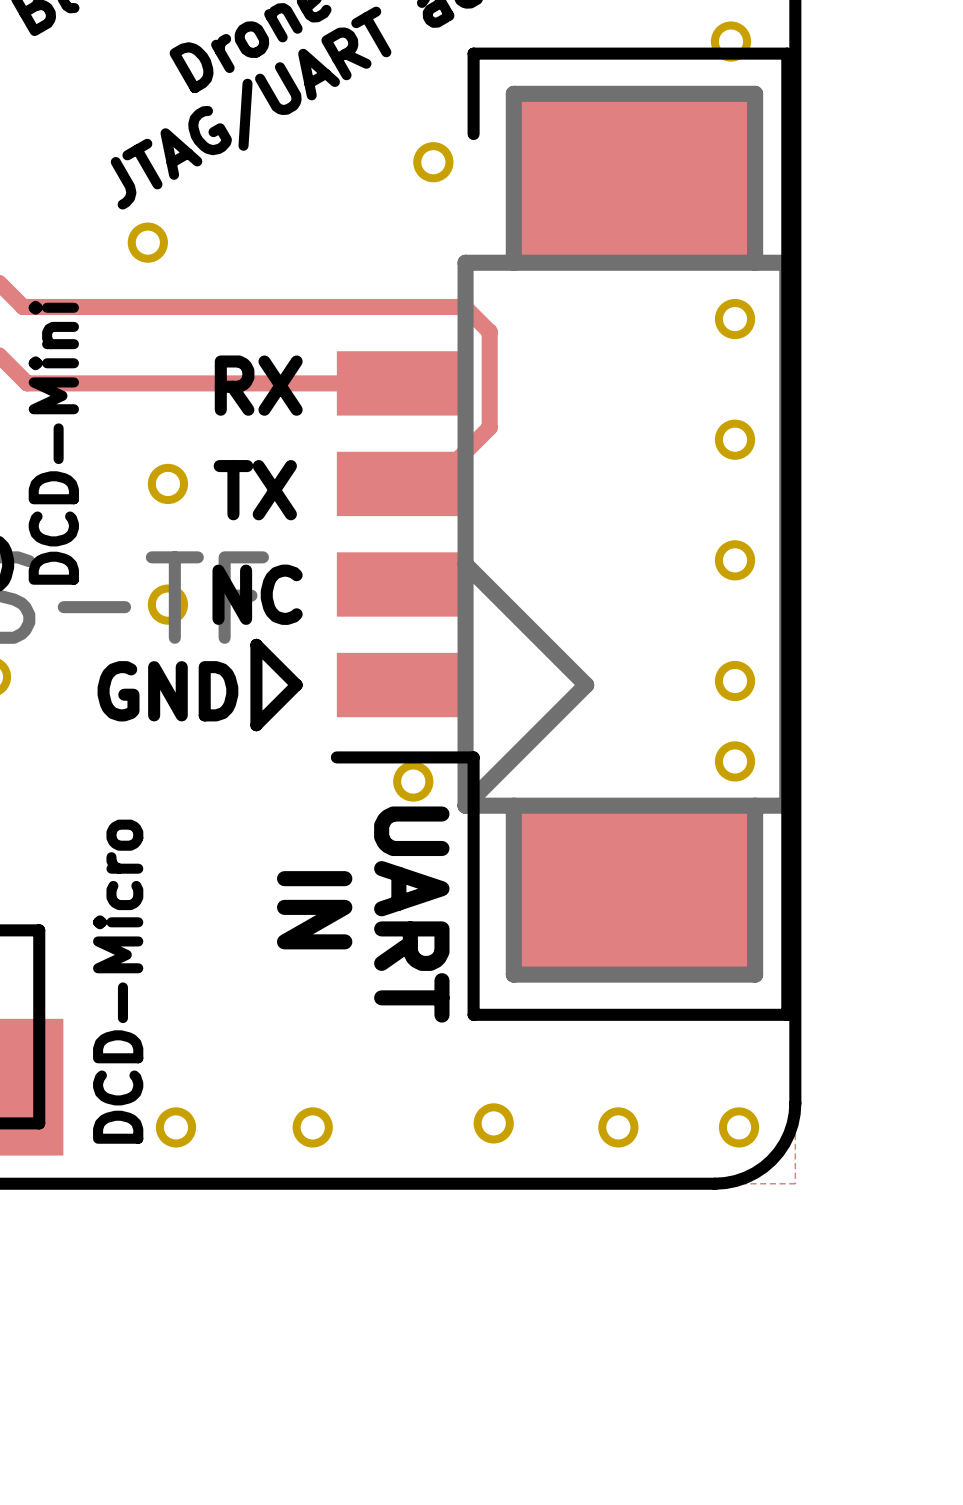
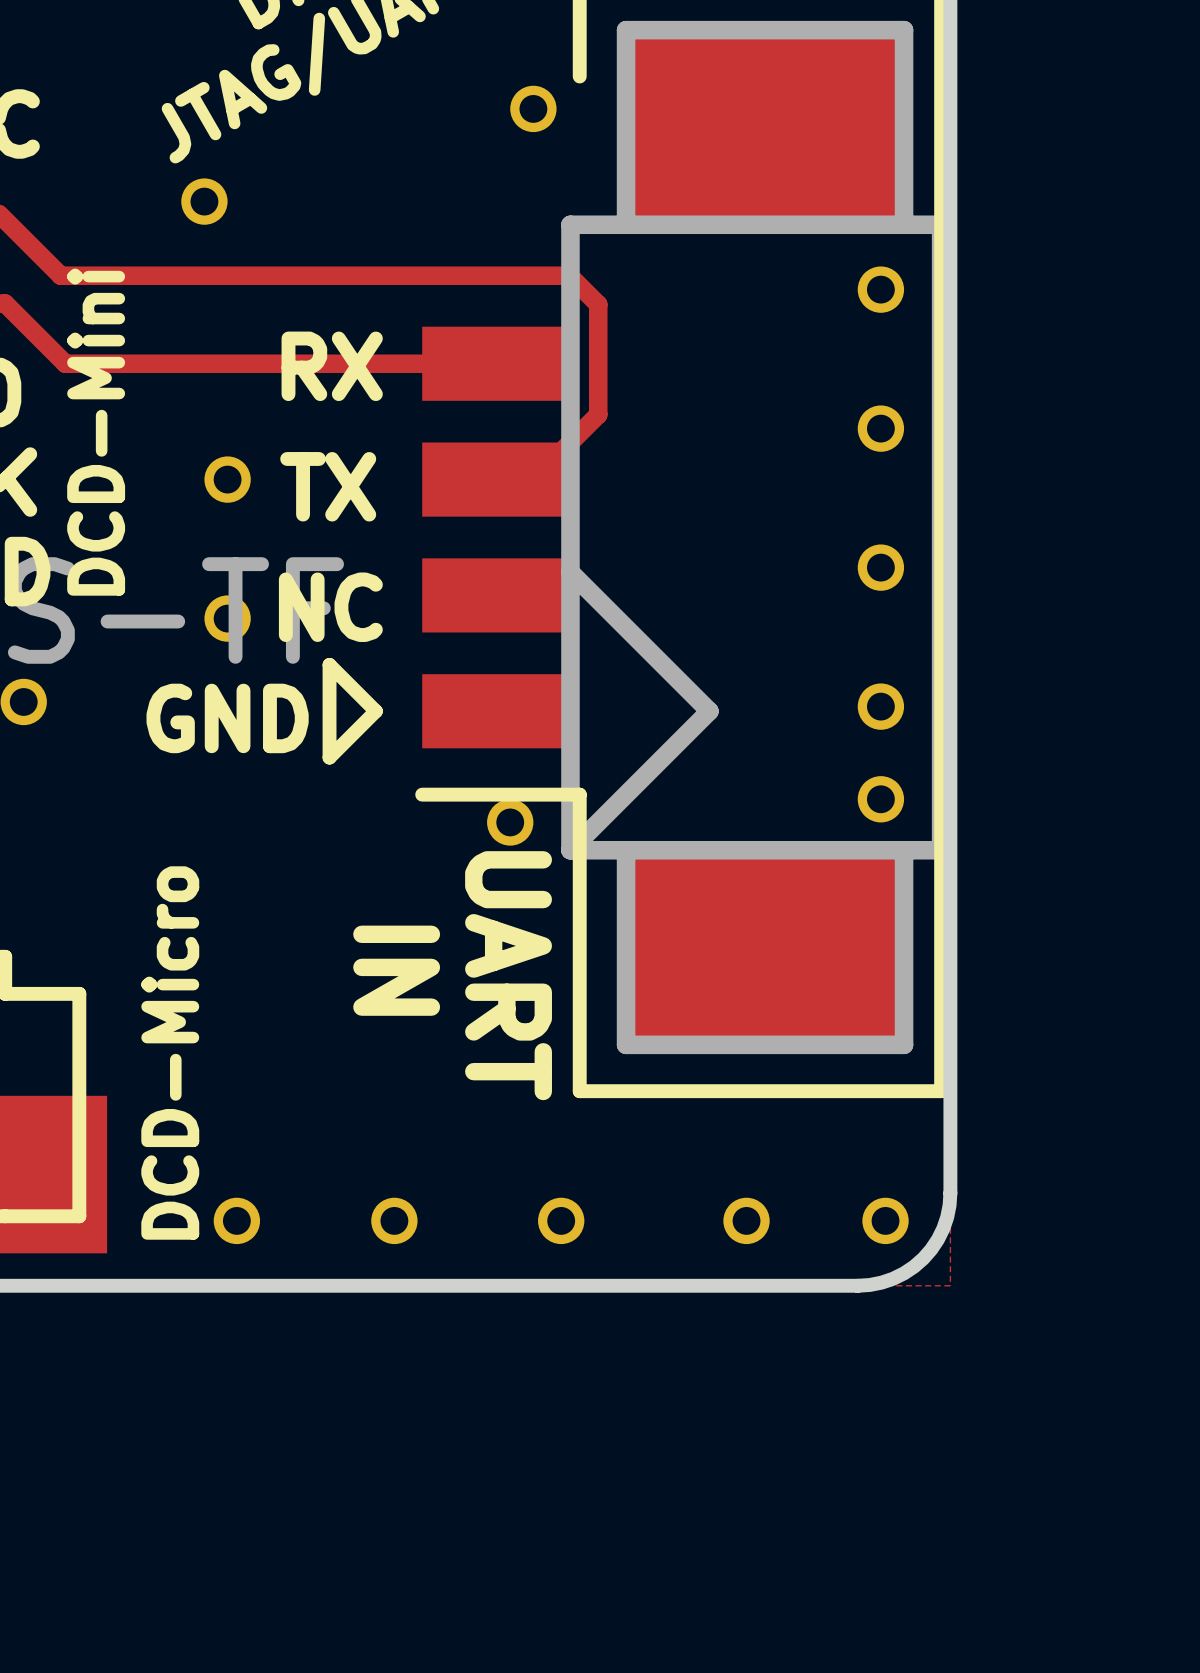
part position: (493, 1123) -> (561, 1220)

